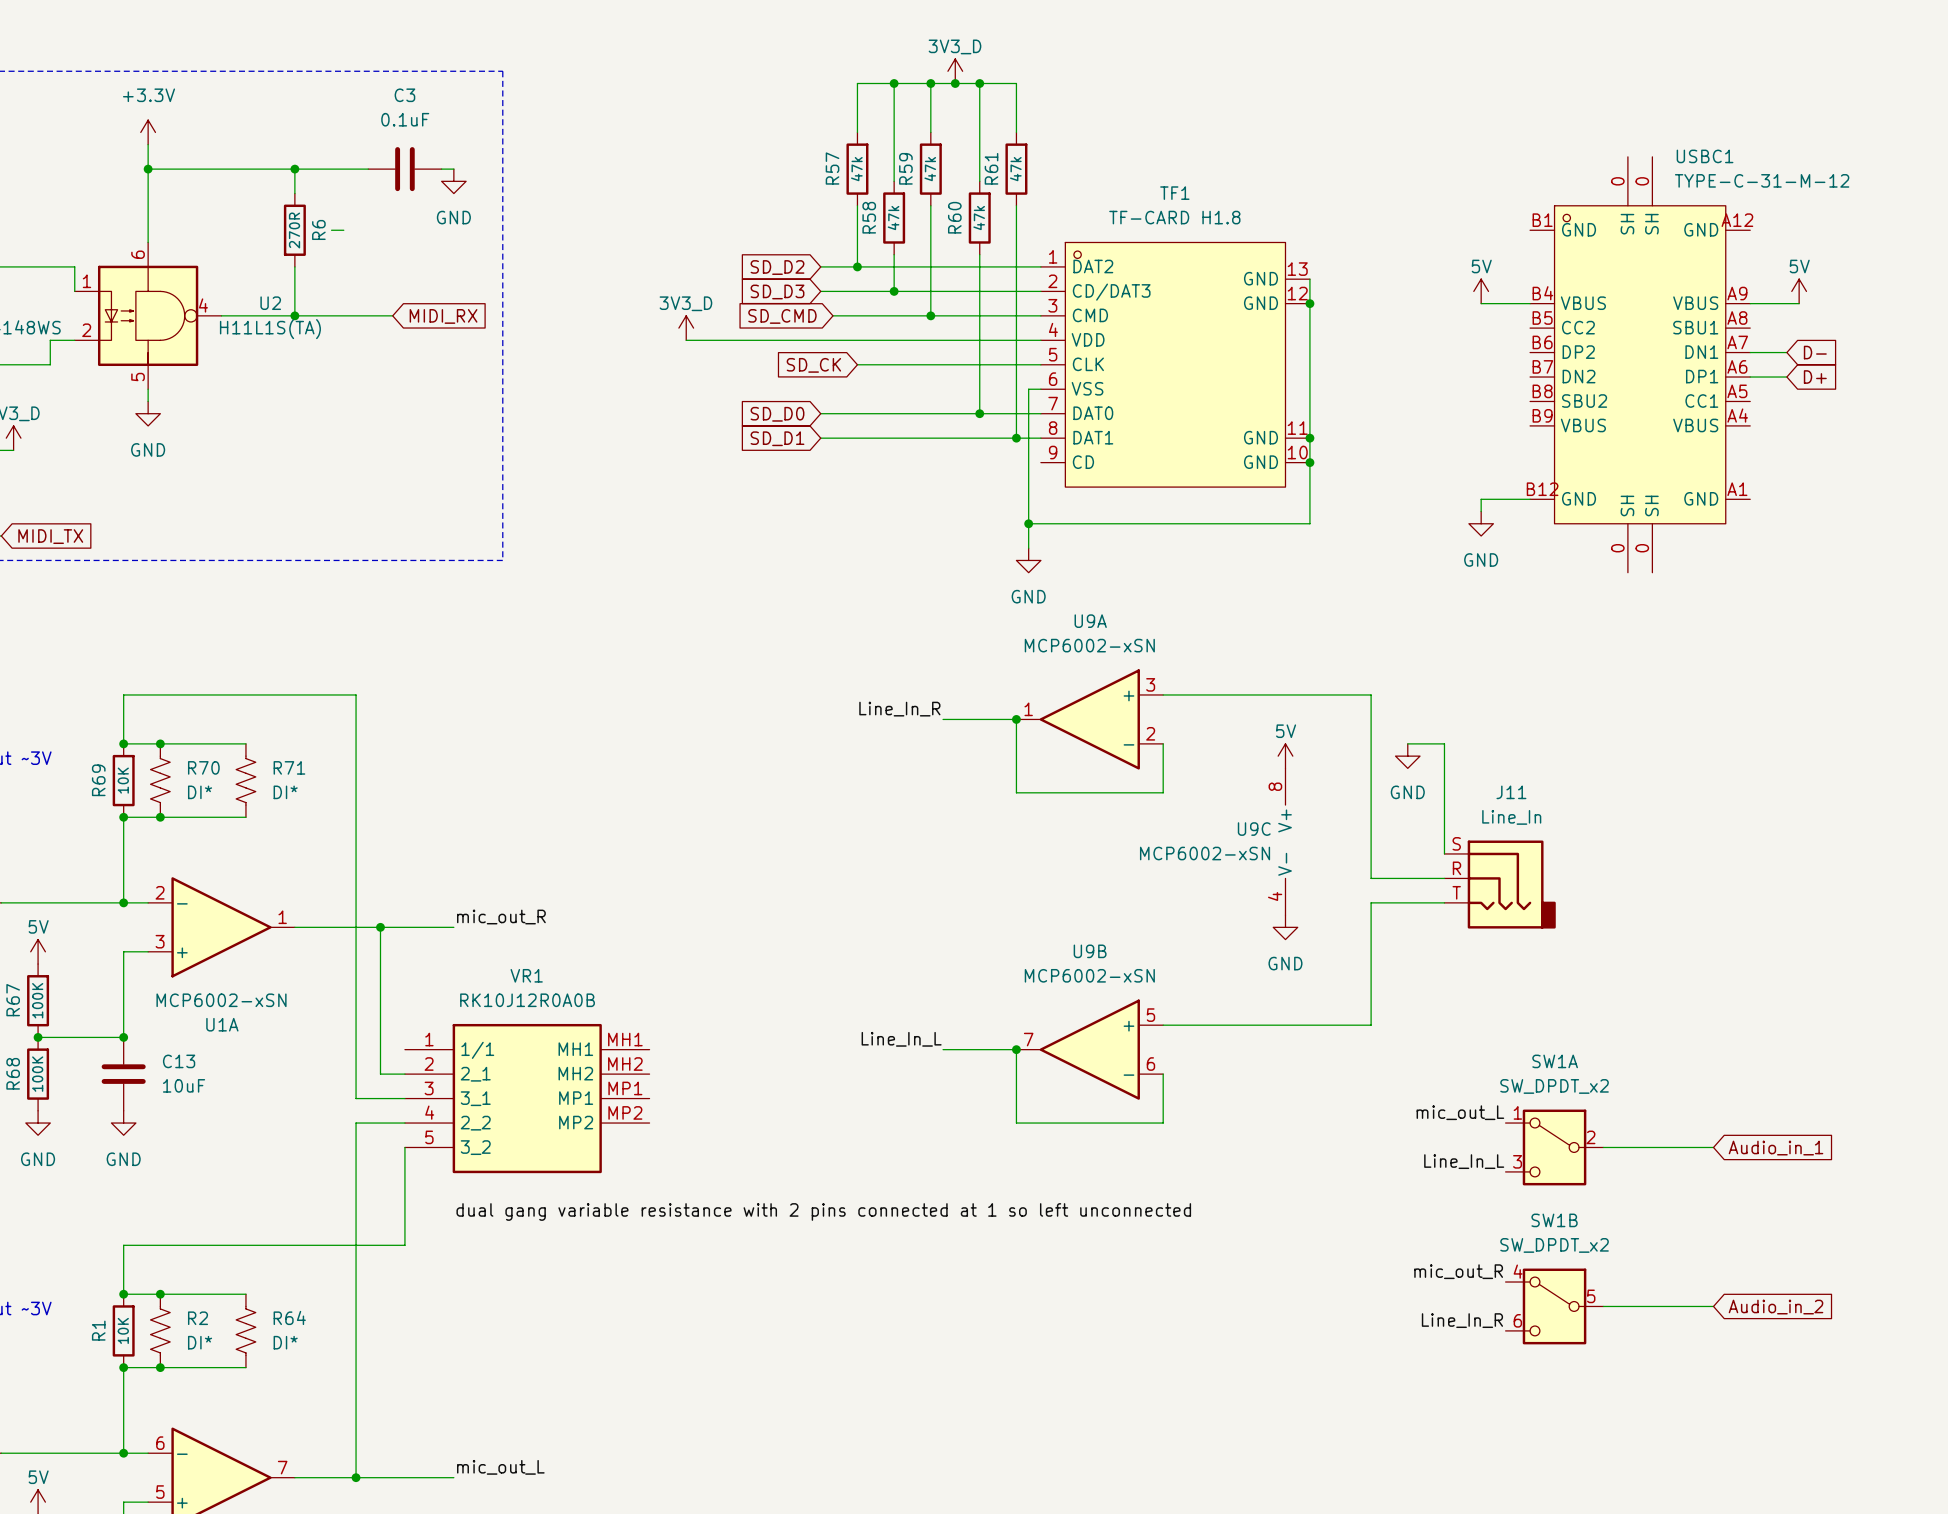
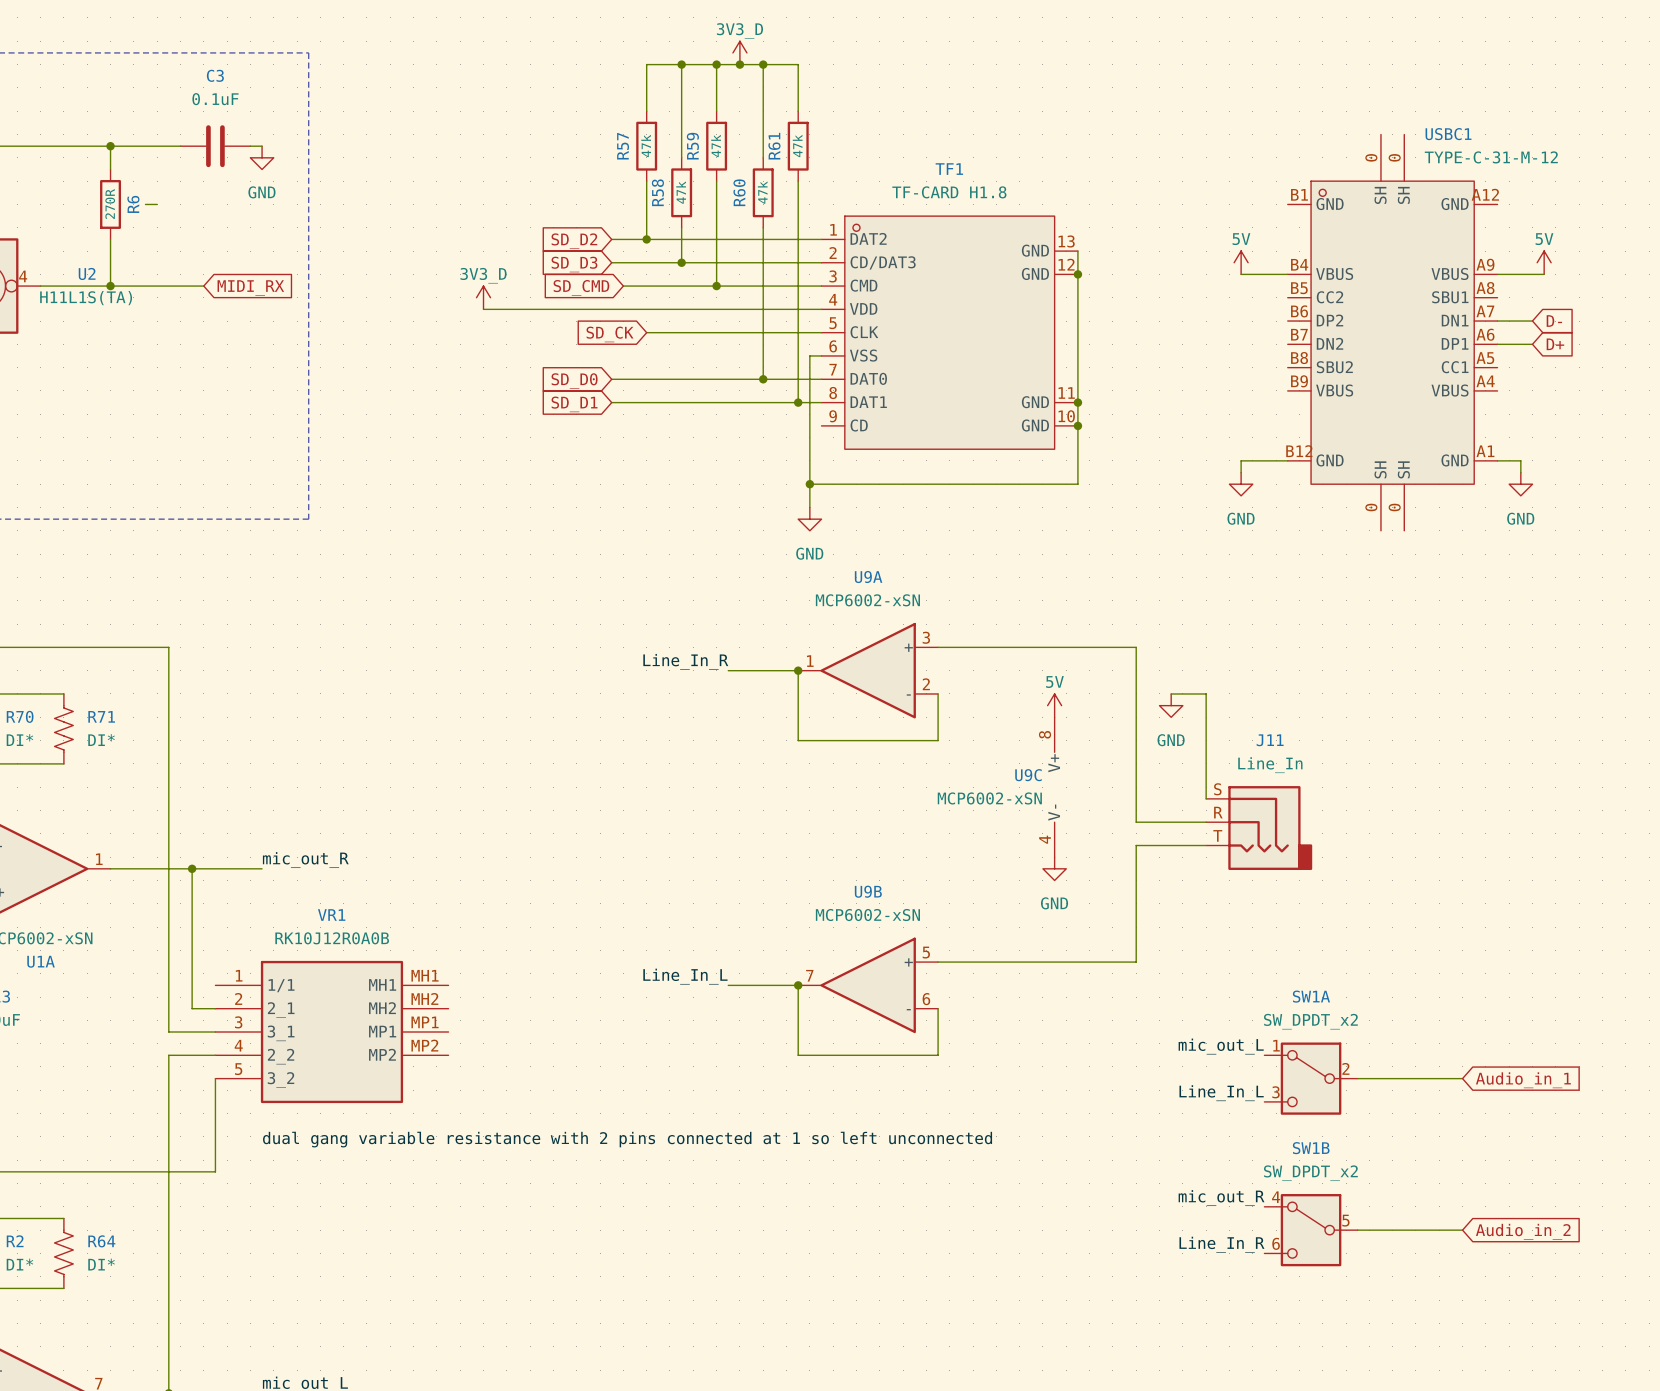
wire: none -> (1497, 460) (1520, 460) (1520, 472)
power symbol: none -> GND (1520, 484)

